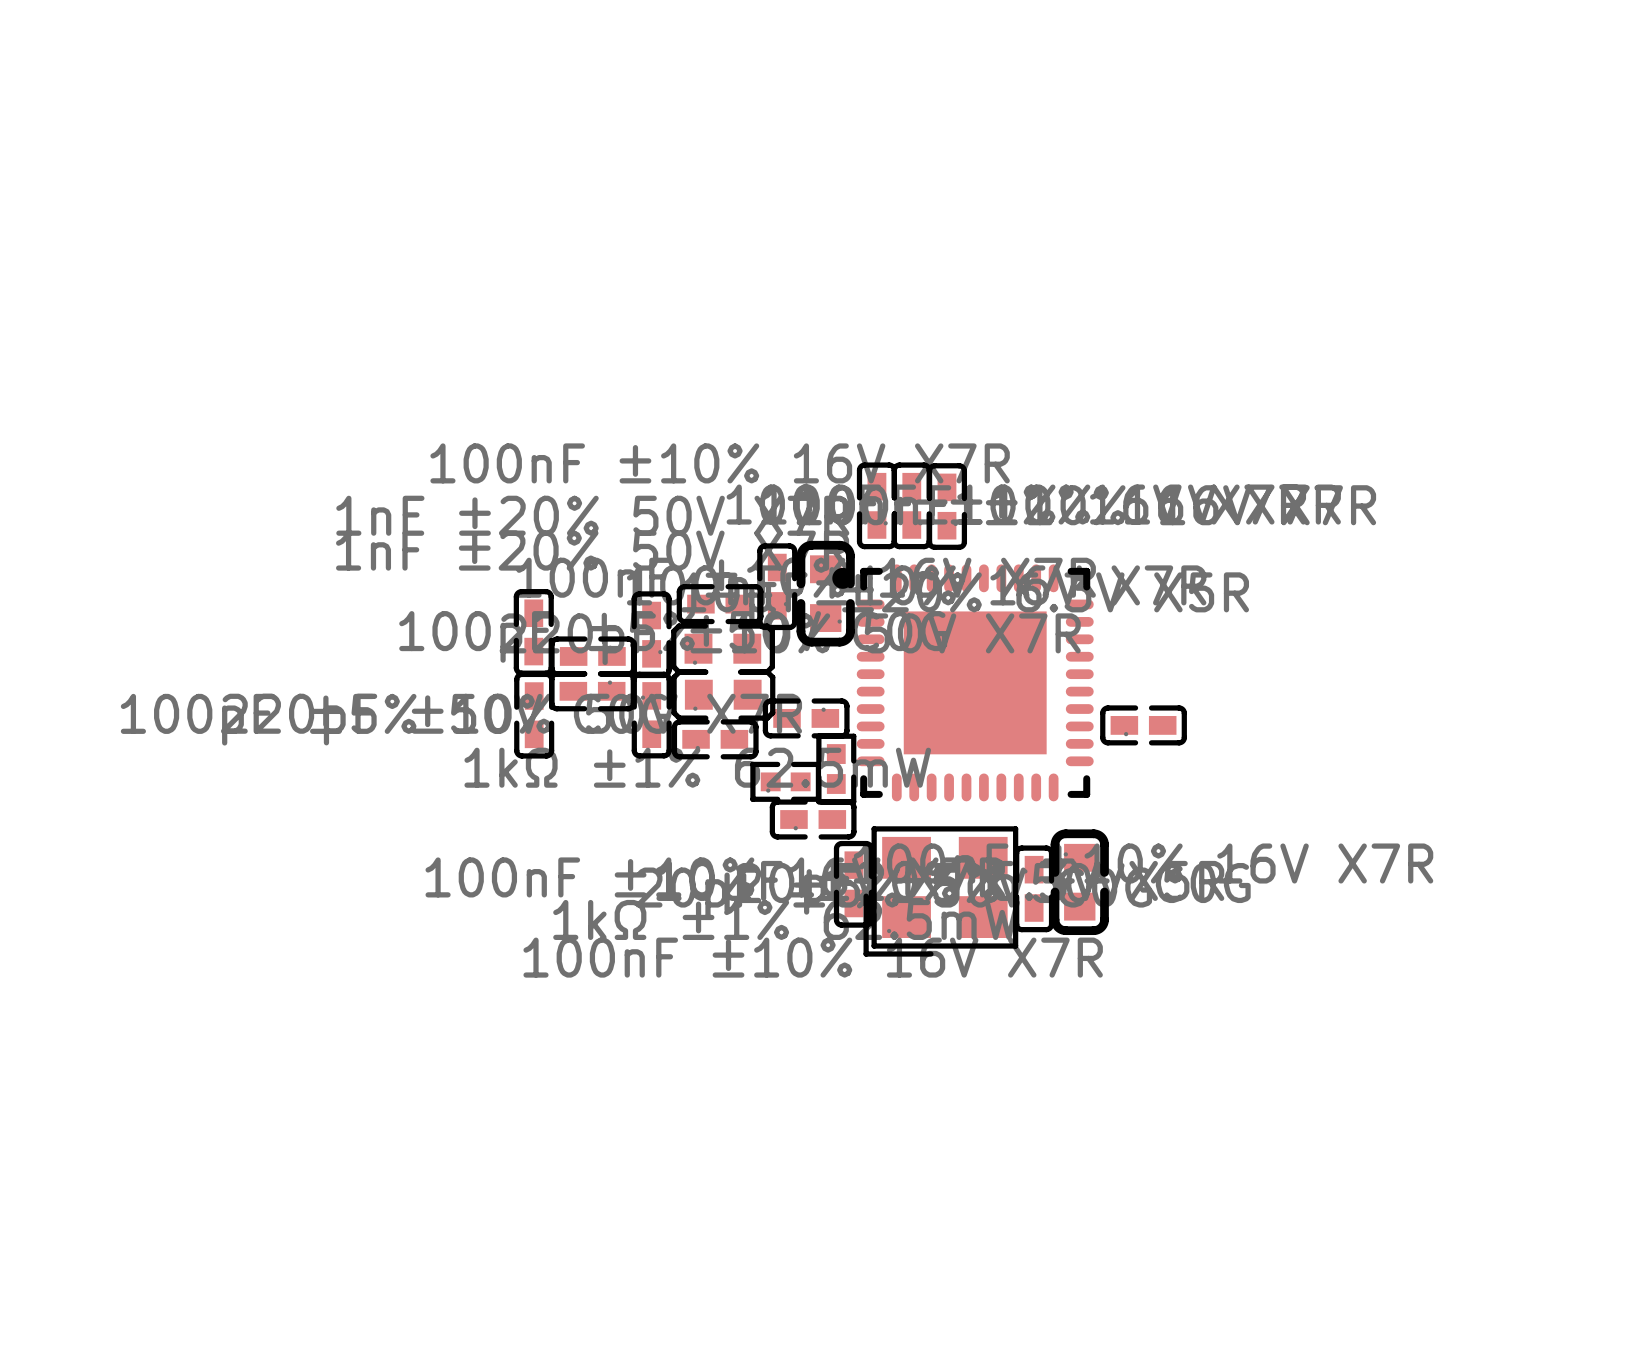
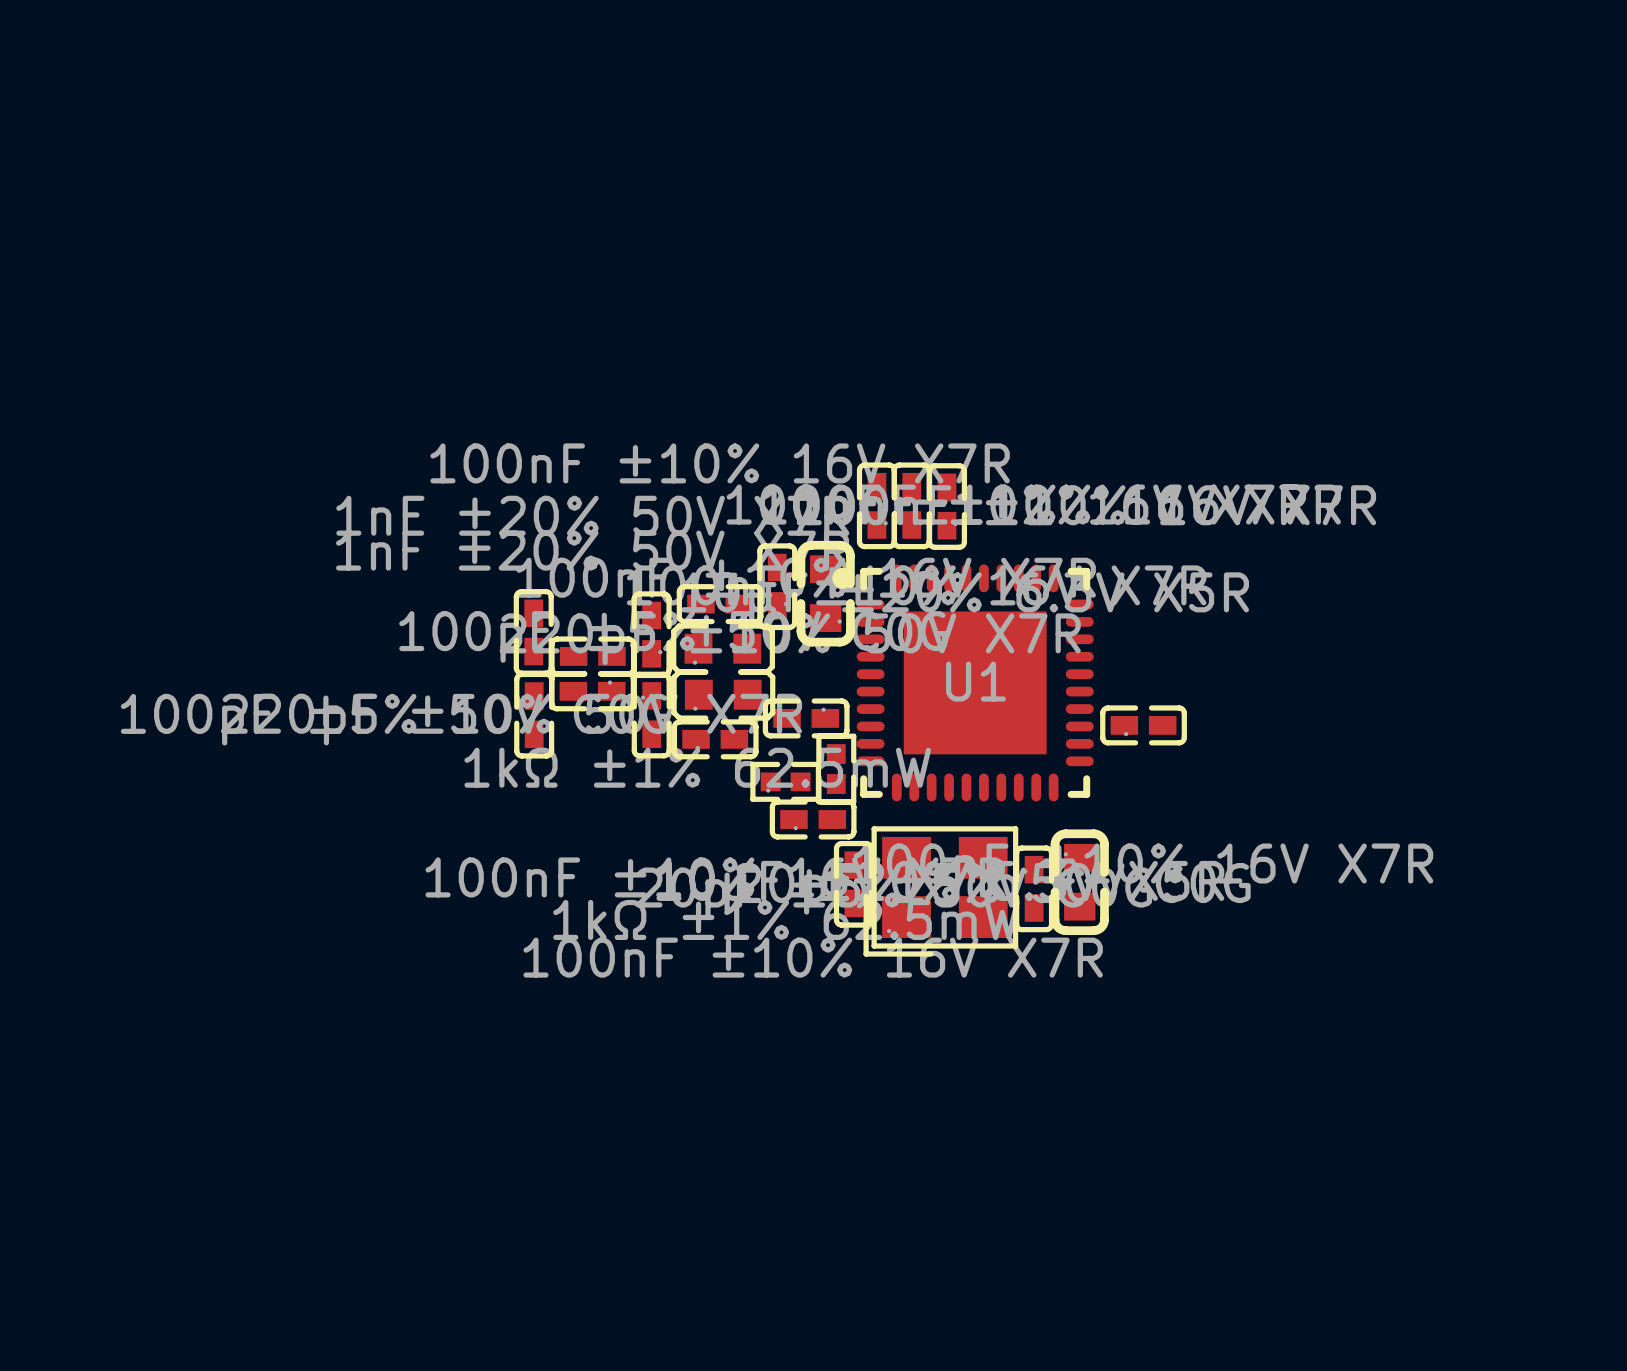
U1 name: none -> U1 (976, 681)

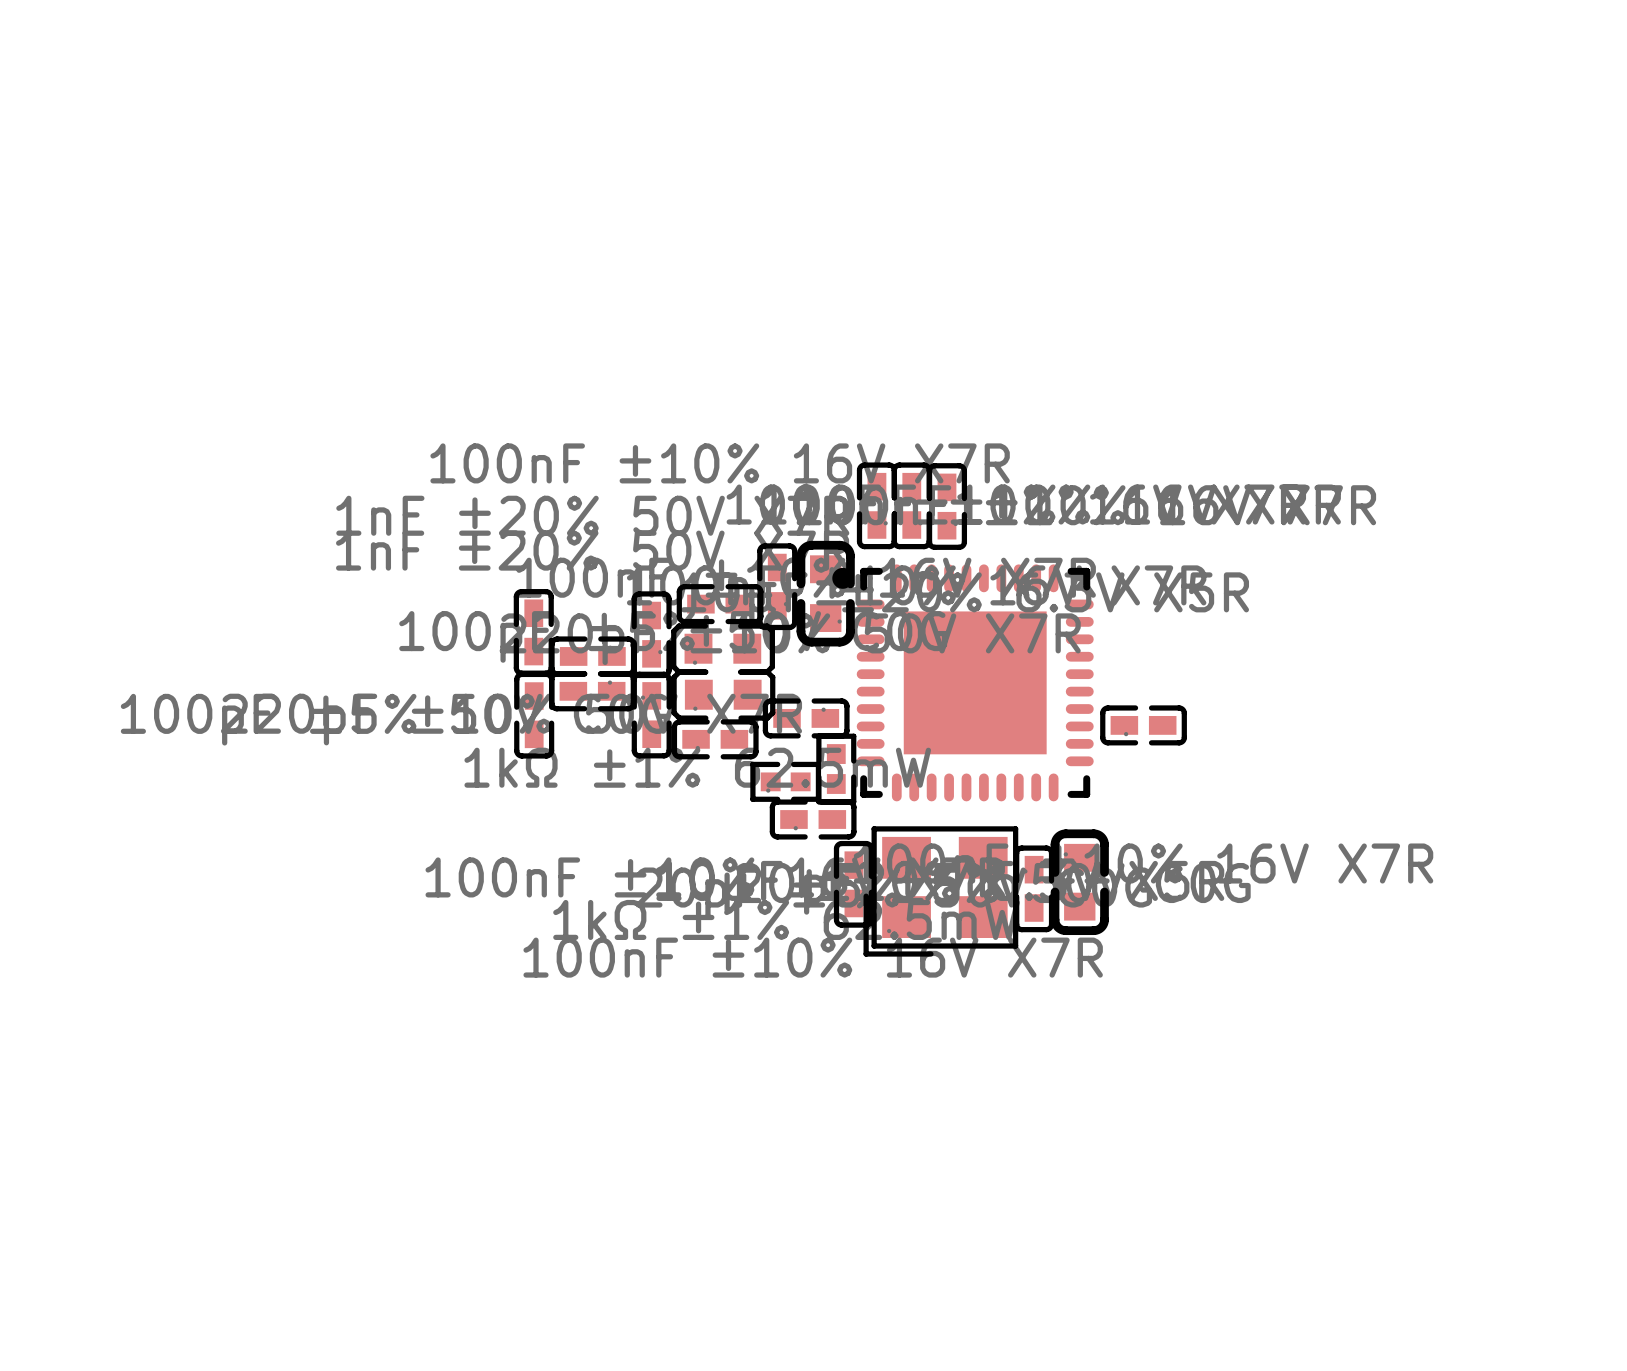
U1 name: U1 (976, 681) -> none

